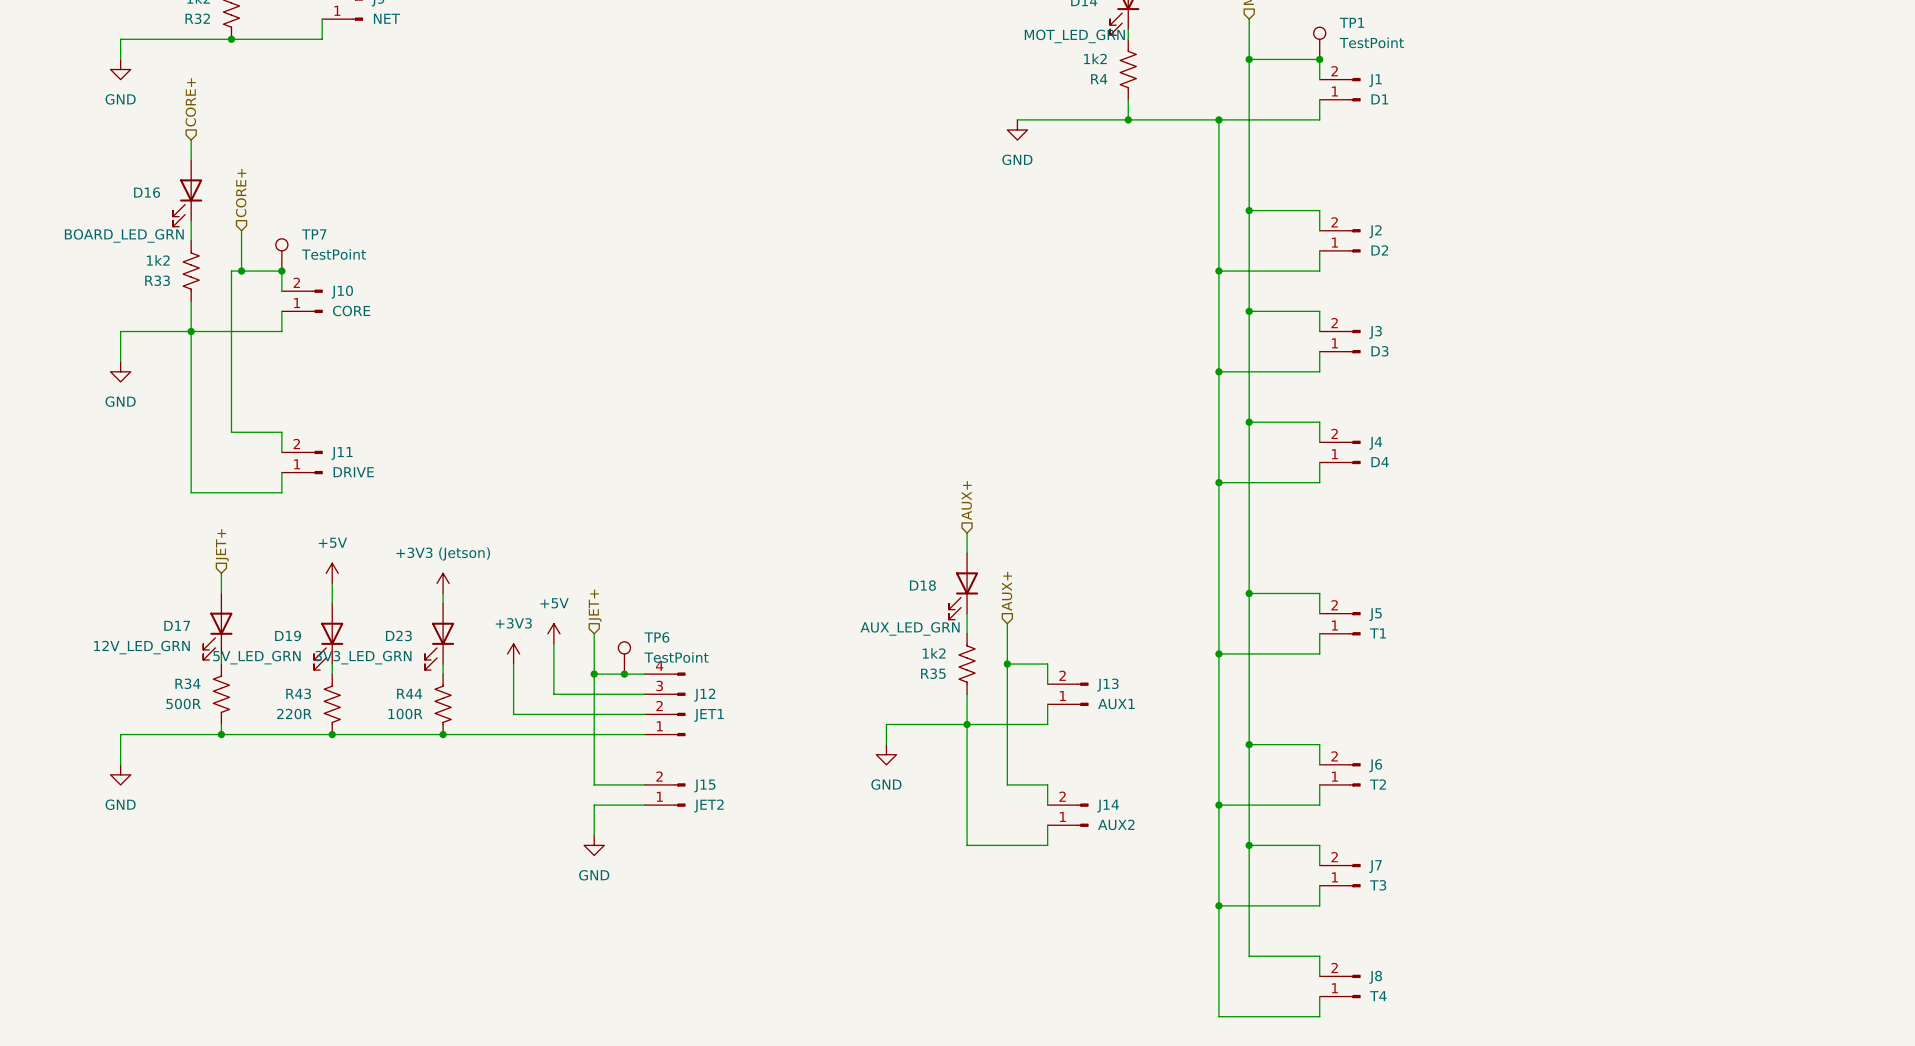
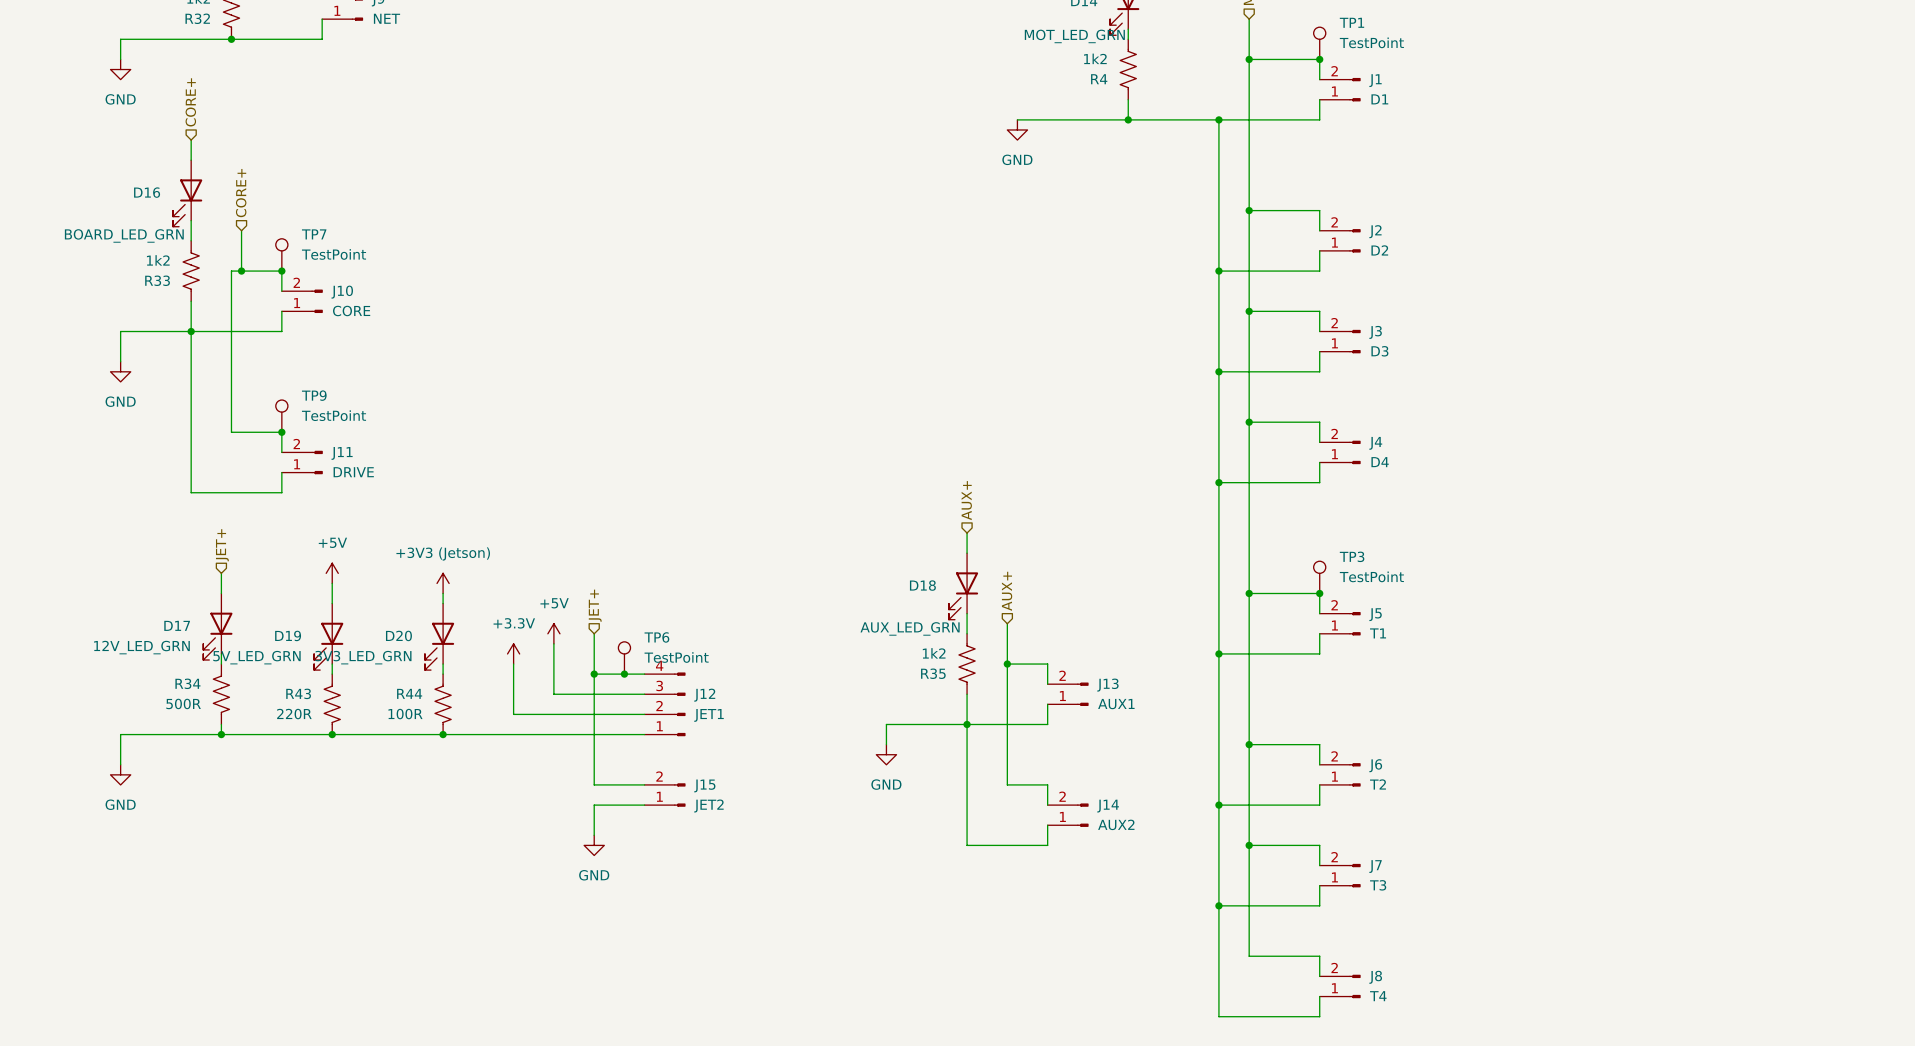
TP9: none -> TestPoint (281, 416)
junction: none -> (281, 432)
TP3: none -> TestPoint (1319, 577)
junction: none -> (1319, 593)
D23 name: D23 (398, 635) -> D20 (398, 635)
power symbol: +3V3 (513, 653) -> +3.3V (513, 653)

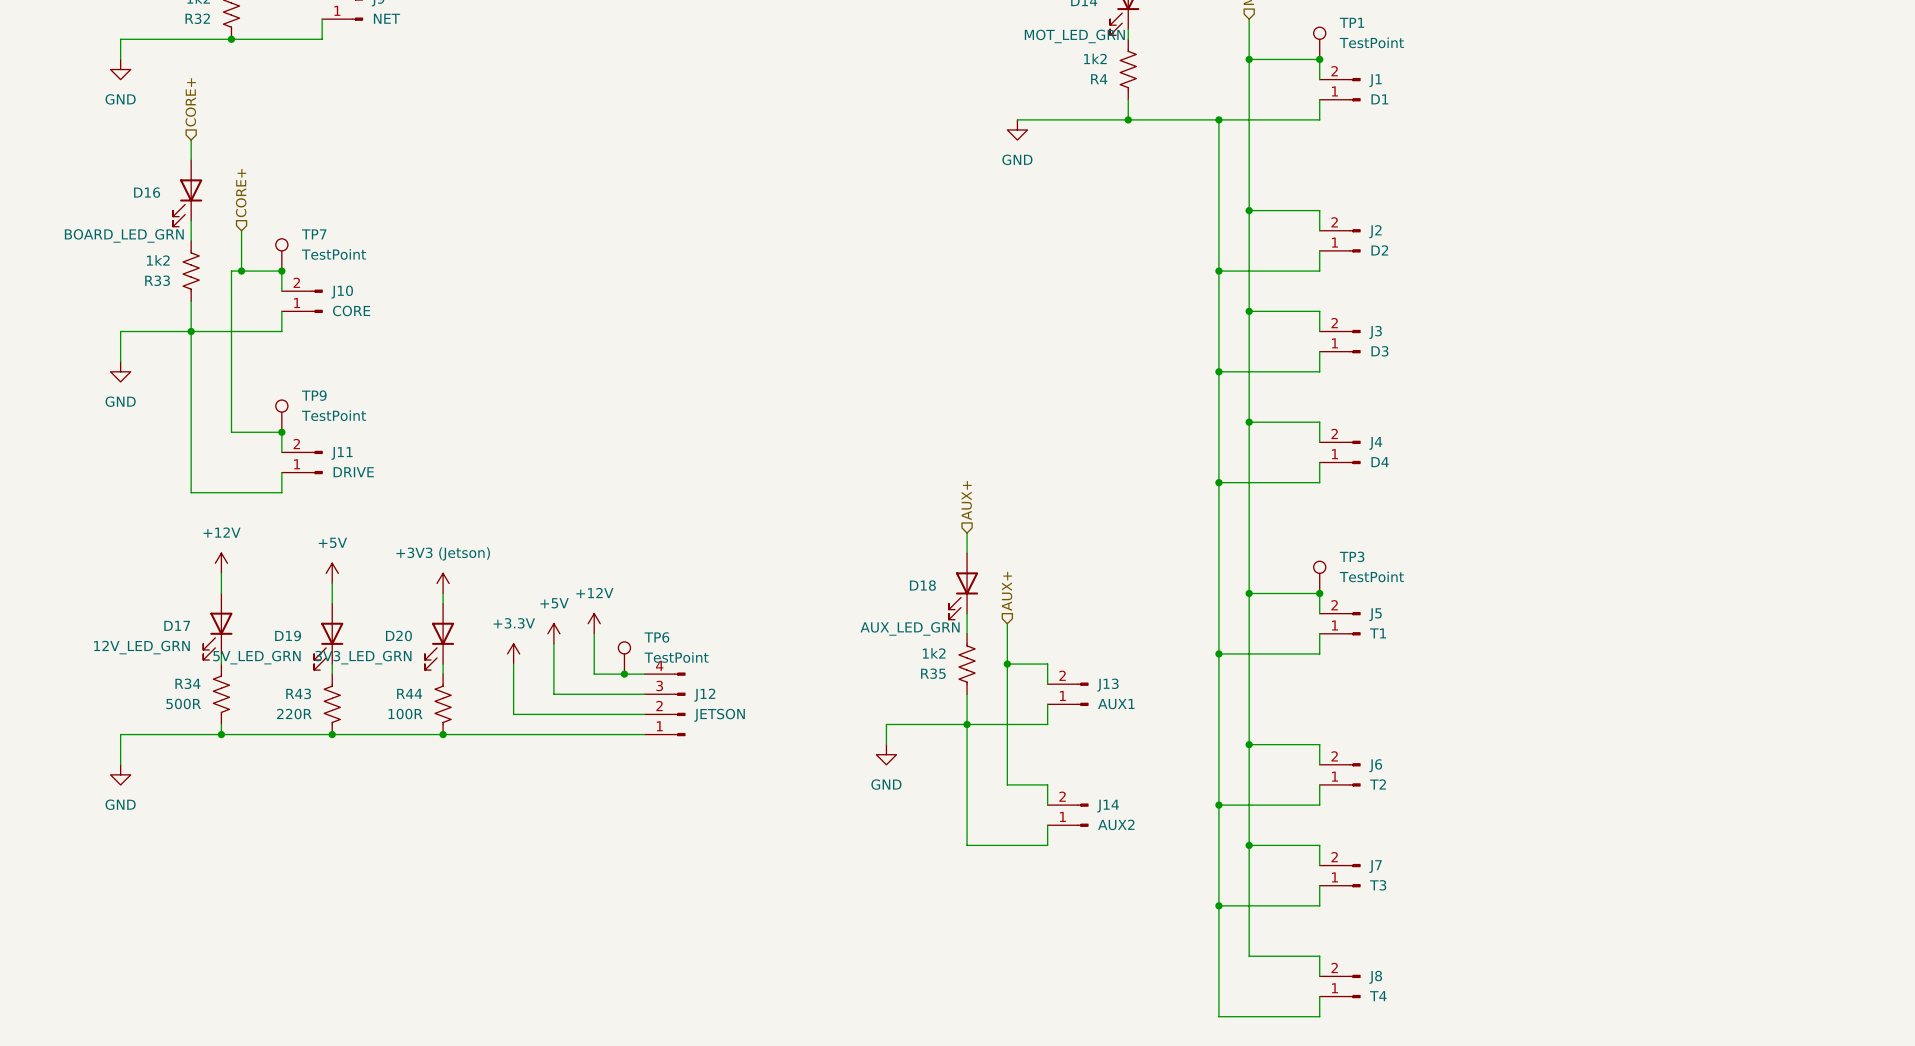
hierarchical label: JET+ (222, 545) -> none
power symbol: none -> +12V (221, 563)
hierarchical label: JET+ (595, 605) -> none
power symbol: none -> +12V (594, 623)
wire: (594, 674) (594, 784) (644, 784) -> none
junction: (594, 674) -> none
J12 value: JET1 (709, 715) -> JETSON (719, 715)
J15: JET2 (665, 795) -> none
wire: (644, 805) (594, 805) (594, 835) -> none
power symbol: GND (594, 845) -> none

